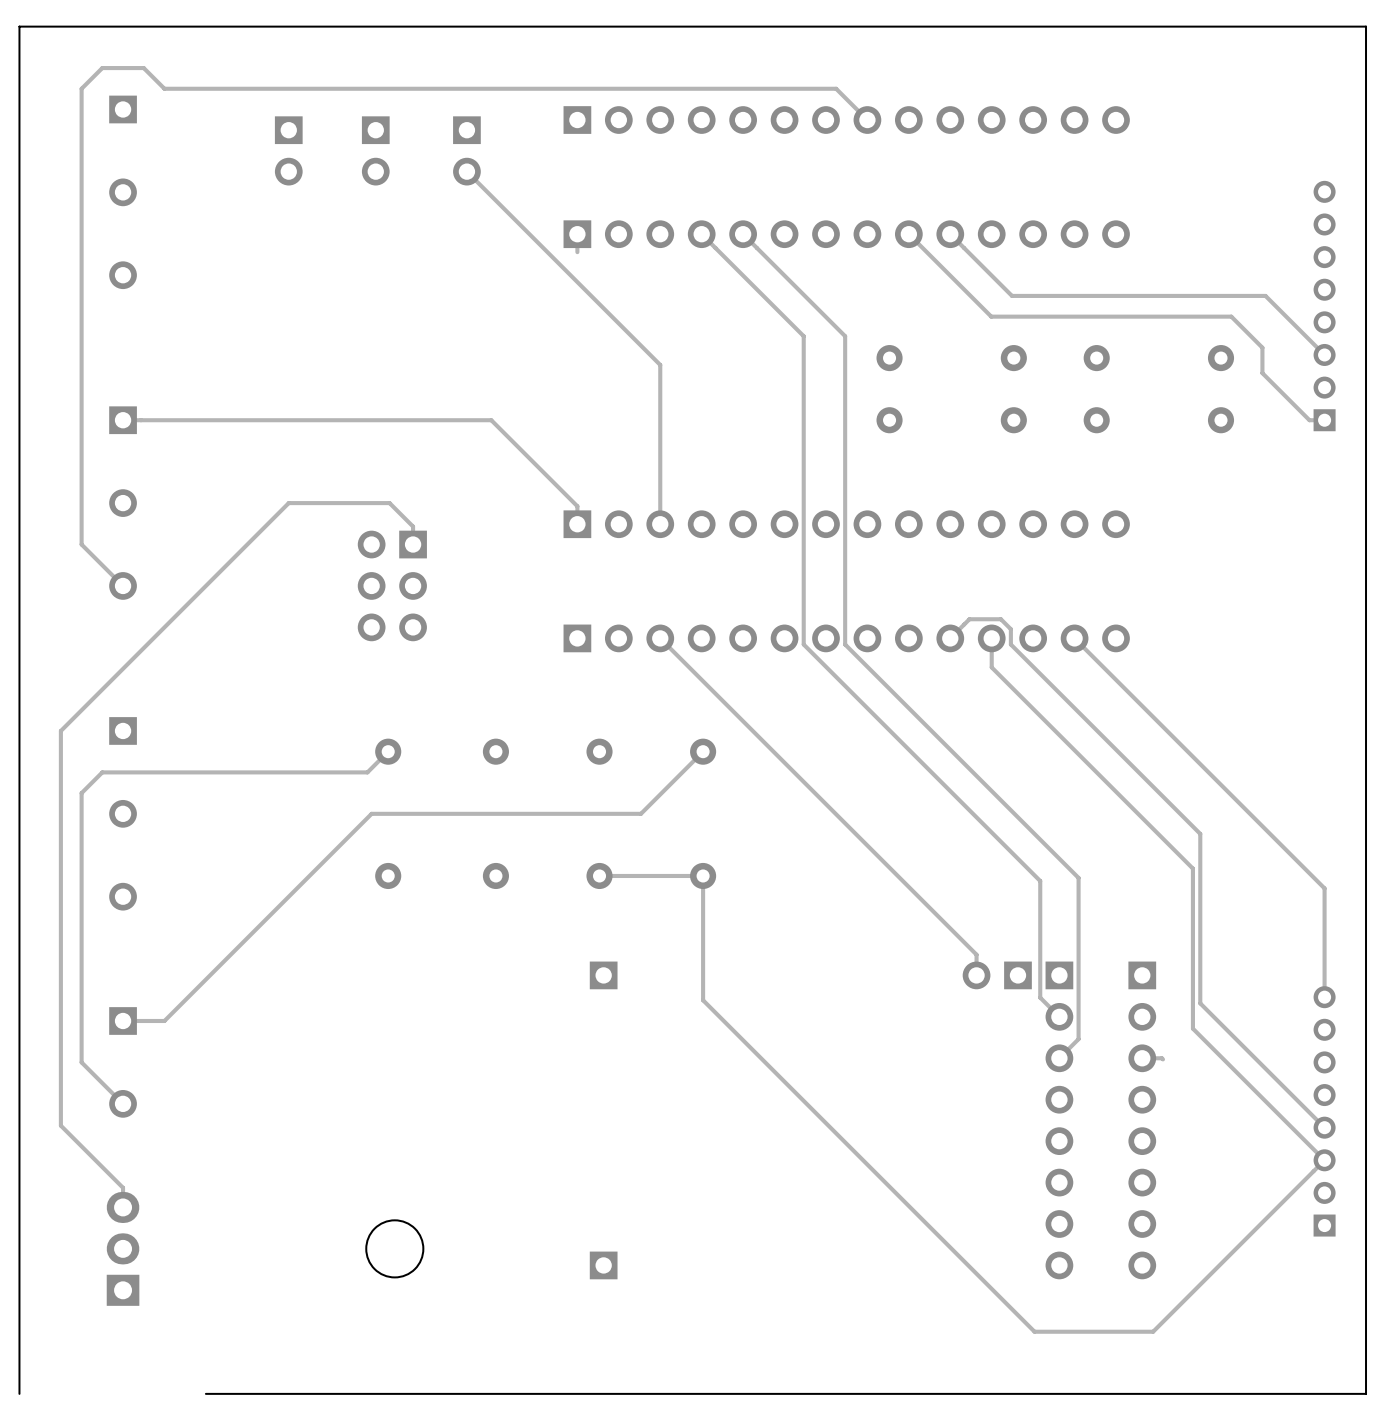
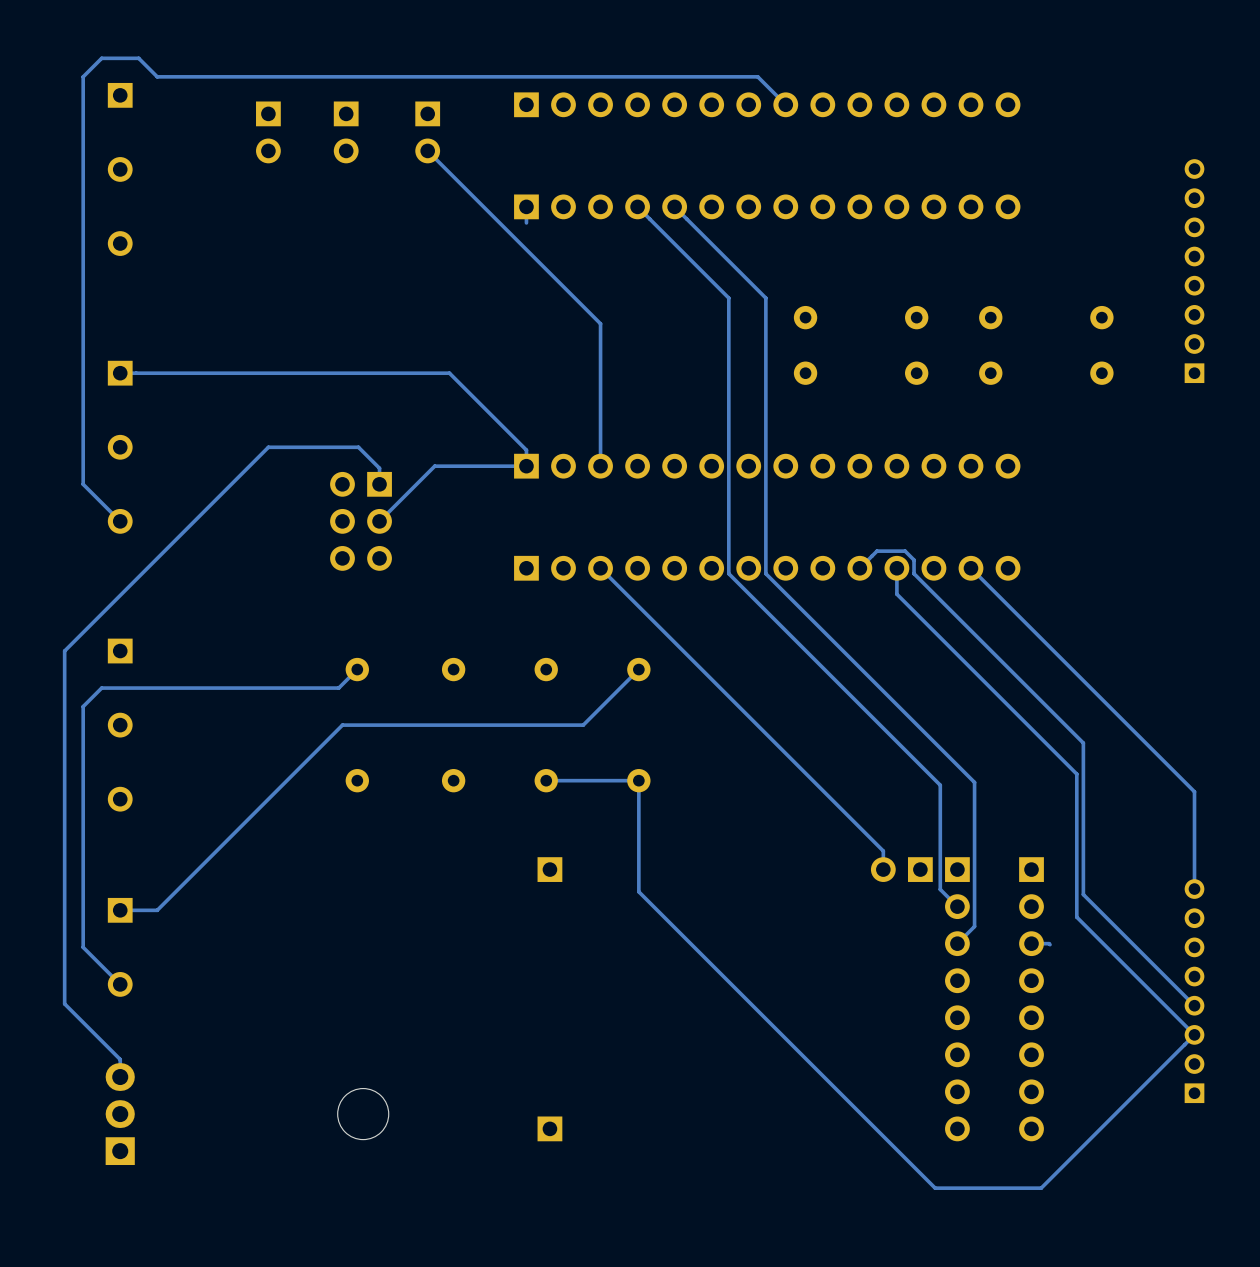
track: (908, 234) (991, 316) (1231, 316) (1262, 347) (1262, 373) (1309, 420) (1324, 420) -> none
track: (950, 234) (1012, 295) (1265, 295) (1324, 354) -> none
track: none -> (526, 466) (434, 466) (379, 521)
board edge: (205, 1393) (1366, 1393) (1366, 26) (19, 26) (19, 1393) -> none

